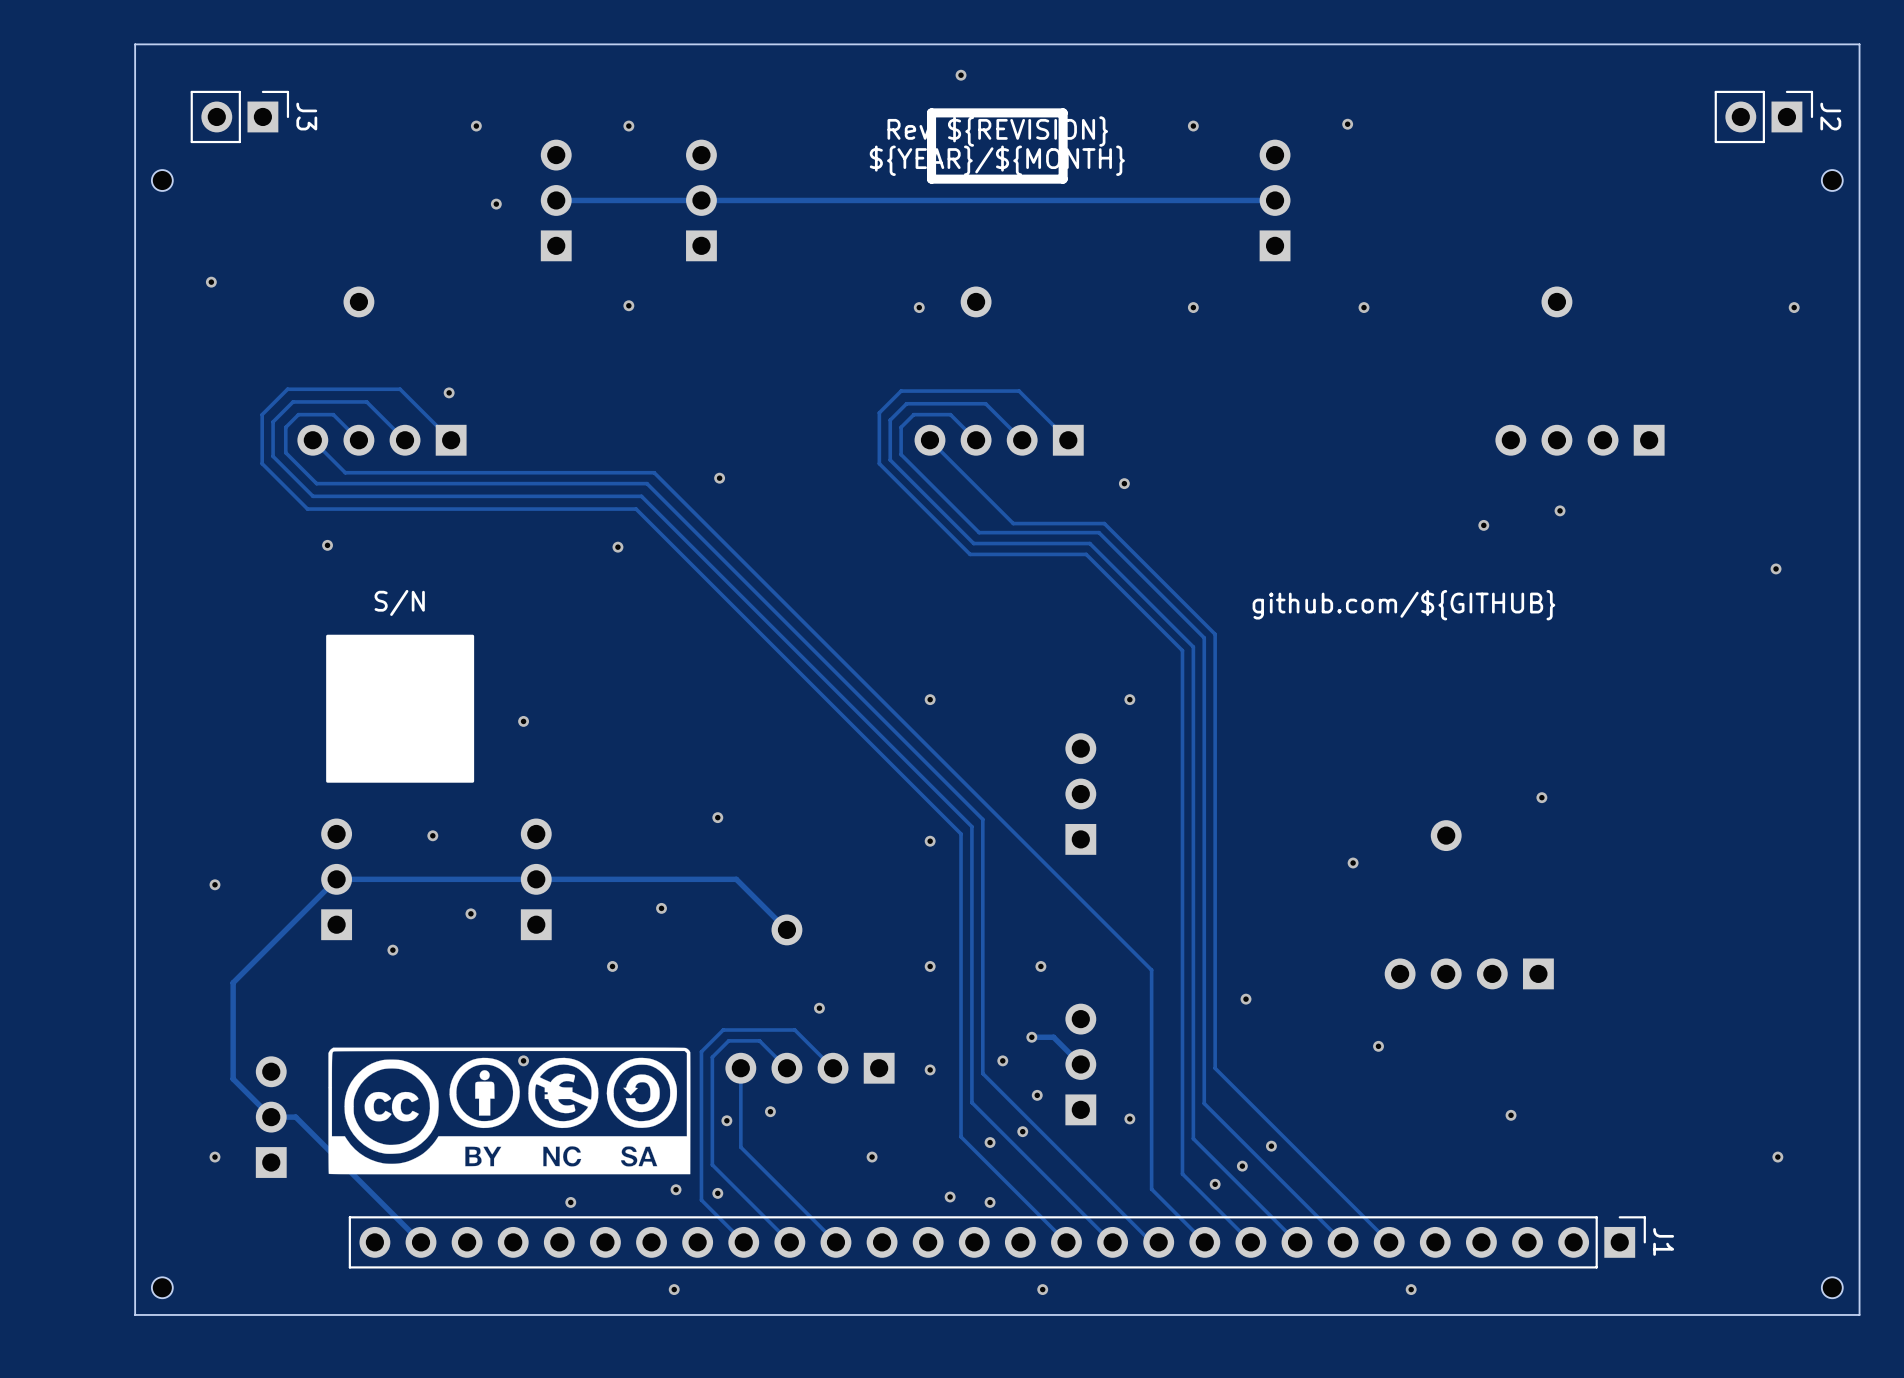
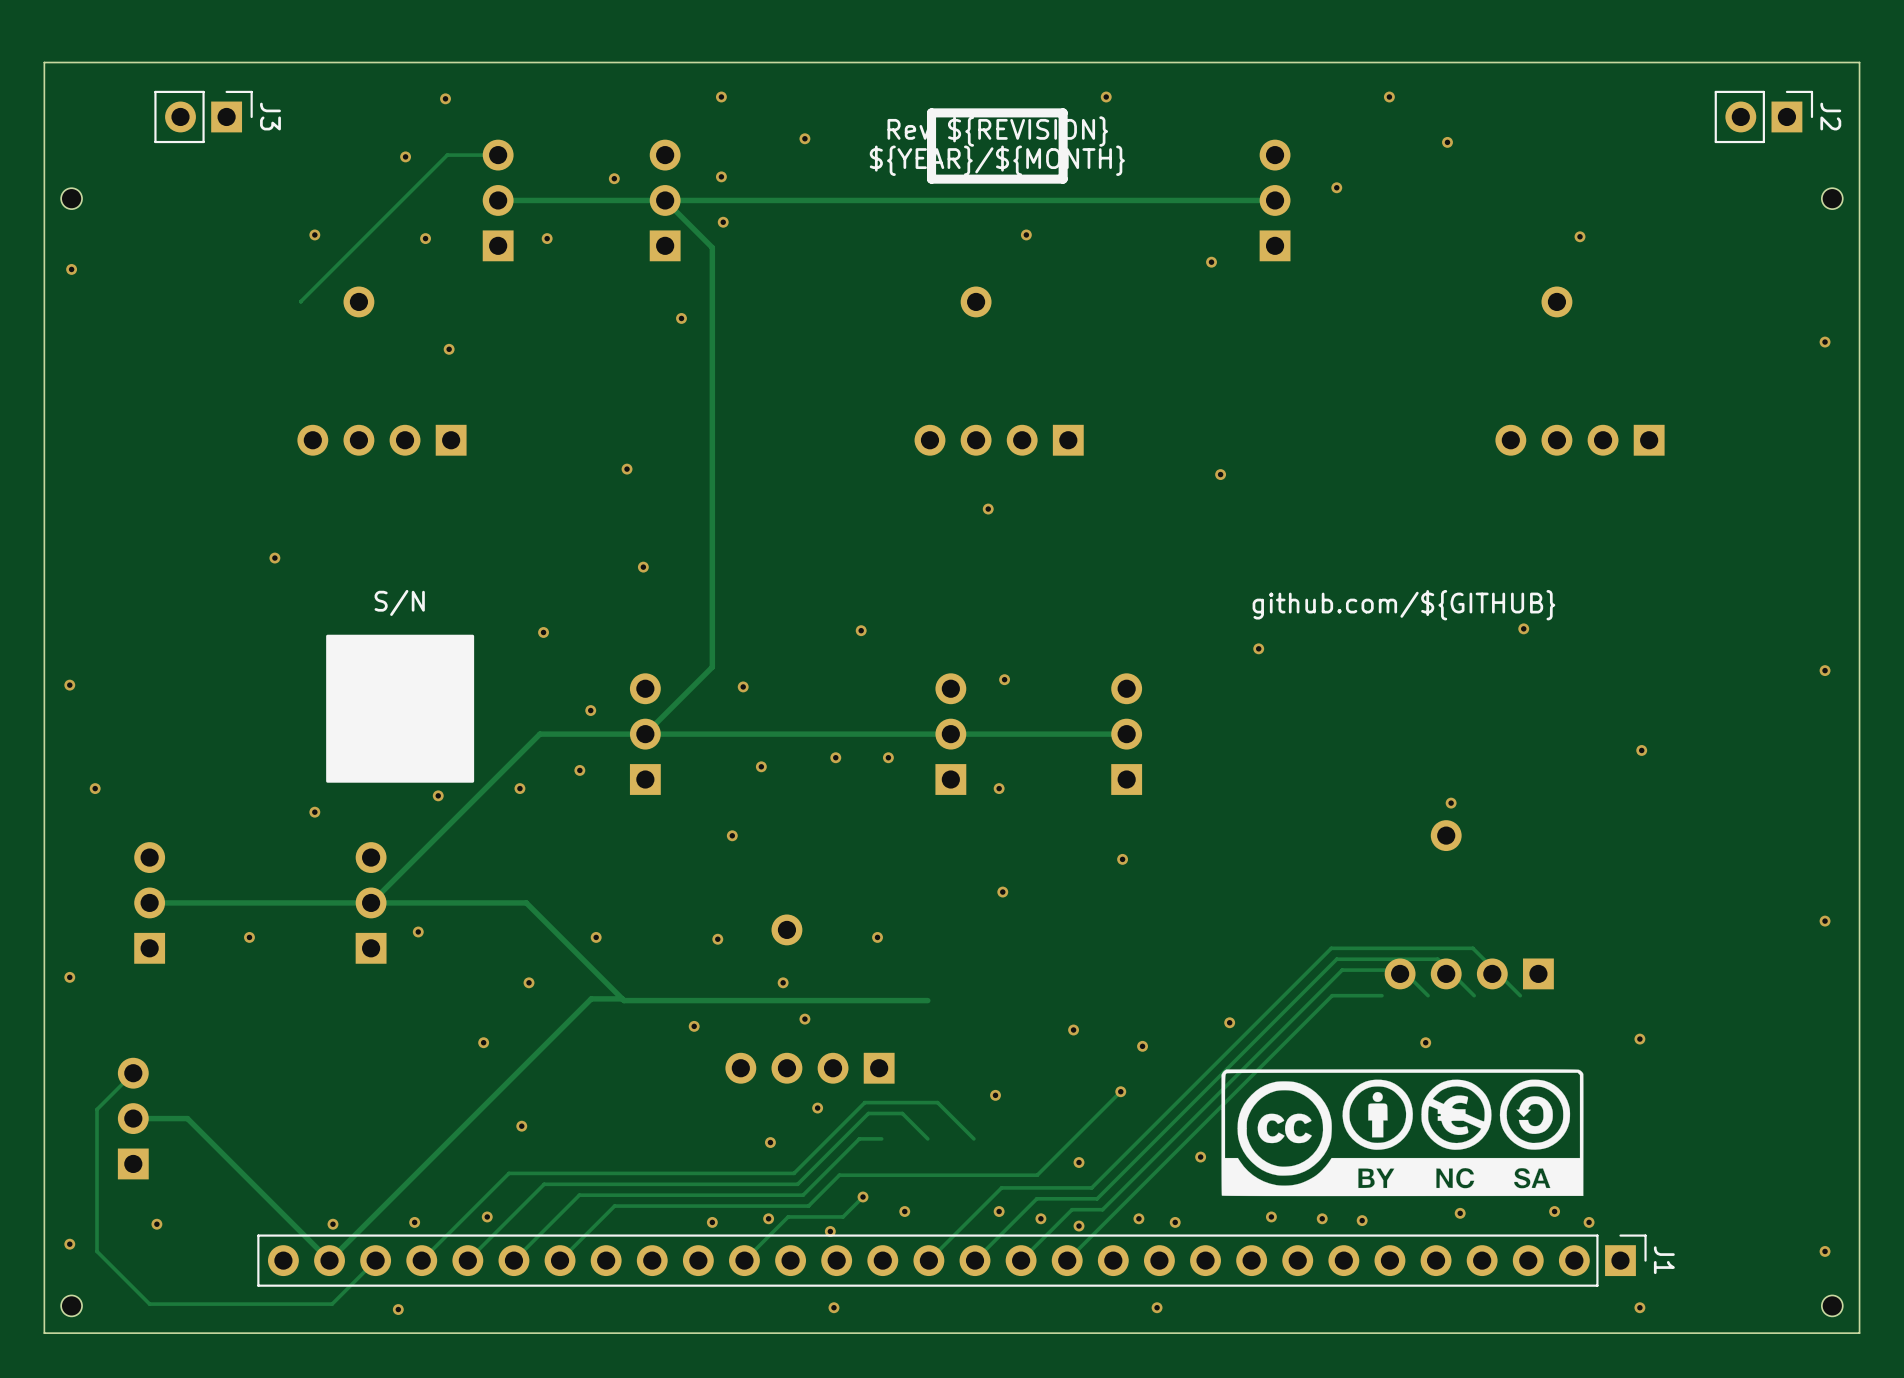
board edge: (1859, 62) (1859, 44) (135, 44) (135, 1314) (1859, 1314) -> (1859, 62) (44, 62) (44, 1333) (1859, 1333) (1859, 1314)
via: (961, 75) -> none
via: none -> (721, 97)
via: none -> (1106, 97)
via: none -> (1389, 97)
via: none -> (445, 98)
J3 position: (239, 116) -> (203, 116)
via: (1347, 124) -> none
via: (476, 126) -> none
via: (628, 126) -> none
via: (1193, 126) -> none
via: none -> (804, 138)
via: none -> (1447, 142)
track: none -> (498, 155) (447, 155) (300, 301)
via: none -> (405, 156)
via: none -> (721, 176)
via: none -> (614, 178)
part position: (162, 180) -> (71, 198)
part position: (1832, 180) -> (1832, 198)
via: none -> (1336, 187)
part: none -> (498, 200)
track: none -> (556, 200) (498, 200)
part: (556, 200) -> none
track: none -> (665, 200) (712, 247) (712, 667) (645, 734)
part position: (701, 200) -> (665, 200)
via: (496, 204) -> none
via: none -> (723, 222)
via: none -> (314, 234)
via: none -> (1026, 234)
via: none -> (1580, 236)
via: none -> (425, 238)
via: none -> (547, 238)
via: none -> (71, 269)
via: (211, 282) -> none
via: (628, 305) -> none
via: (919, 307) -> none
via position: (1193, 307) -> (1211, 262)
via: (1363, 307) -> none
via position: (1794, 307) -> (1825, 342)
via: none -> (681, 318)
via position: (449, 392) -> (449, 349)
track: (312, 440) (345, 472) (654, 472) (1151, 970) (1151, 1189) (1204, 1242) -> none
track: (358, 440) (333, 414) (298, 414) (285, 427) (285, 452) (316, 483) (647, 483) (982, 819) (982, 1073) (1151, 1242) (1158, 1242) -> none
track: (405, 440) (366, 401) (293, 401) (273, 421) (273, 456) (313, 496) (641, 496) (971, 826) (971, 1102) (1112, 1242) -> none
track: (451, 440) (400, 389) (287, 389) (262, 414) (262, 463) (307, 509) (636, 509) (961, 833) (961, 1136) (1066, 1242) -> none
track: (929, 440) (1013, 523) (1104, 523) (1215, 634) (1215, 1068) (1389, 1242) -> none
track: (976, 440) (950, 414) (913, 414) (901, 427) (901, 454) (979, 532) (1098, 532) (1204, 637) (1204, 1103) (1343, 1242) -> none
track: (1022, 440) (985, 403) (906, 403) (890, 420) (890, 460) (973, 543) (1089, 543) (1193, 647) (1193, 1138) (1297, 1242) -> none
track: (1068, 440) (1019, 391) (901, 391) (879, 412) (879, 463) (970, 554) (1086, 554) (1182, 650) (1182, 1173) (1250, 1242) -> none
via: none -> (627, 469)
via: none -> (1220, 474)
via: (719, 478) -> none
via: (1124, 483) -> none
via: none -> (988, 509)
via: (1560, 510) -> none
via: (1483, 525) -> none
via position: (327, 545) -> (274, 558)
via position: (617, 547) -> (643, 567)
via: (1776, 568) -> none
via: none -> (1523, 628)
via: none -> (861, 630)
via: none -> (543, 632)
via: none -> (1258, 648)
via: none -> (1825, 670)
via: none -> (1004, 679)
via: none -> (69, 685)
via: none -> (743, 686)
via: (930, 699) -> none
via: (1129, 699) -> none
via: none -> (590, 710)
via: (523, 721) -> none
part: none -> (645, 734)
part: none -> (950, 734)
track: none -> (1126, 734) (539, 734) (371, 902)
part: none -> (1126, 734)
via: none -> (1641, 750)
via: none -> (835, 757)
via: none -> (888, 757)
via: none -> (761, 766)
via: none -> (579, 770)
via: none -> (95, 788)
via: none -> (519, 788)
via: none -> (999, 788)
part: (1080, 794) -> none
via: (1541, 797) -> none
via: none -> (1451, 803)
via: none -> (314, 812)
via position: (717, 817) -> (732, 835)
via position: (432, 835) -> (438, 795)
via: (930, 841) -> none
via: none -> (1122, 859)
via: (1353, 863) -> none
part position: (336, 879) -> (371, 902)
part: (536, 879) -> none
via: (214, 884) -> none
via: none -> (1002, 892)
track: none -> (149, 902) (526, 902) (624, 1000) (927, 1000)
part: none -> (149, 902)
via: (661, 908) -> none
via: (470, 913) -> none
via: none -> (1825, 921)
track: (786, 929) (736, 879) (336, 879) (233, 982) (233, 1079) (271, 1117) (295, 1117) (421, 1242) -> none
via: none -> (418, 931)
via: none -> (249, 937)
via: none -> (877, 937)
via: none -> (717, 939)
via: (392, 950) -> none
via position: (612, 966) -> (596, 937)
via: (930, 966) -> none
via: (1040, 966) -> none
via: none -> (69, 977)
via: none -> (529, 982)
via: none -> (783, 982)
track: none -> (1381, 995) (1332, 995) (1067, 1260)
track: none -> (1428, 995) (1402, 970) (1342, 970) (1102, 1209) (1072, 1209) (1021, 1260)
track: none -> (1474, 995) (1437, 959) (1336, 959) (1097, 1198) (1036, 1198) (975, 1260)
track: none -> (1520, 995) (1472, 948) (1331, 948) (1091, 1187) (1001, 1187) (928, 1260)
track: none -> (622, 998) (591, 998) (329, 1260) (187, 1118) (133, 1118)
via position: (1246, 999) -> (1229, 1022)
via position: (819, 1008) -> (804, 1019)
via: none -> (694, 1026)
via: none -> (1073, 1030)
track: (1031, 1037) (1053, 1037) (1080, 1064) -> none
via: (1031, 1037) -> none
via: none -> (1639, 1039)
via: none -> (483, 1042)
via: none -> (1142, 1046)
via position: (1378, 1046) -> (1425, 1042)
drawing: [328, 1047, 691, 1175] -> none
via: (523, 1060) -> none
via: (1002, 1060) -> none
part: (1080, 1064) -> none
track: (740, 1068) (740, 1147) (835, 1242) -> none
track: (786, 1068) (759, 1040) (728, 1040) (712, 1057) (712, 1164) (789, 1242) -> none
track: (833, 1068) (794, 1030) (723, 1030) (701, 1051) (701, 1200) (743, 1242) -> none
via: (930, 1069) -> none
drawing: none -> [1221, 1069, 1584, 1197]
track: none -> (133, 1073) (97, 1109) (97, 1251) (149, 1304) (332, 1304) (375, 1260)
track: none -> (1120, 1091) (1037, 1175) (839, 1175) (808, 1206) (614, 1206) (560, 1260)
via: none -> (995, 1095)
via: (1037, 1095) -> none
via: none -> (817, 1108)
via: (770, 1111) -> none
via: (1511, 1115) -> none
part: (271, 1117) -> none
part: none -> (133, 1118)
via position: (1129, 1118) -> (1120, 1091)
via: (726, 1120) -> none
via: none -> (521, 1126)
via: (1022, 1131) -> none
track: none -> (881, 1138) (859, 1138) (803, 1195) (579, 1195) (513, 1260)
track: none -> (927, 1138) (902, 1113) (868, 1113) (797, 1184) (544, 1184) (467, 1260)
track: none -> (973, 1138) (937, 1102) (864, 1102) (794, 1173) (508, 1173) (421, 1260)
via: none -> (770, 1142)
via: (990, 1142) -> none
via: (1271, 1146) -> none
via: (214, 1157) -> none
via: (872, 1157) -> none
via: none -> (1200, 1157)
via: (1777, 1157) -> none
via: none -> (1079, 1162)
via: (1242, 1166) -> none
via: (1215, 1184) -> none
via: (676, 1189) -> none
via: (717, 1193) -> none
track: none -> (863, 1197) (843, 1216) (788, 1216) (744, 1260)
via: none -> (863, 1197)
via: (950, 1197) -> none
via: (570, 1202) -> none
via position: (990, 1202) -> (999, 1211)
via: none -> (904, 1211)
via: none -> (1554, 1211)
via: none -> (1460, 1213)
J1 footprint: [348, 1216, 1646, 1269] -> [257, 1234, 1647, 1287]
via: none -> (487, 1216)
via: none -> (1271, 1216)
via: none -> (768, 1218)
via: none -> (1040, 1218)
via: none -> (1138, 1218)
via: none -> (1322, 1218)
via: none -> (1362, 1220)
via: none -> (414, 1222)
via: none -> (712, 1222)
via: none -> (1175, 1222)
via: none -> (1589, 1222)
via: none -> (156, 1224)
via: none -> (332, 1224)
via: none -> (1079, 1226)
via: none -> (830, 1231)
J1 name position: J1 (1663, 1241) -> J1 (1664, 1260)
via: none -> (69, 1244)
via: none -> (1825, 1251)
part position: (162, 1287) -> (71, 1305)
part position: (1832, 1287) -> (1832, 1305)
via: (674, 1289) -> none
via: (1042, 1289) -> none
via: (1411, 1289) -> none
via: none -> (833, 1307)
via: none -> (1157, 1307)
via: none -> (1639, 1307)
via: none -> (398, 1309)

